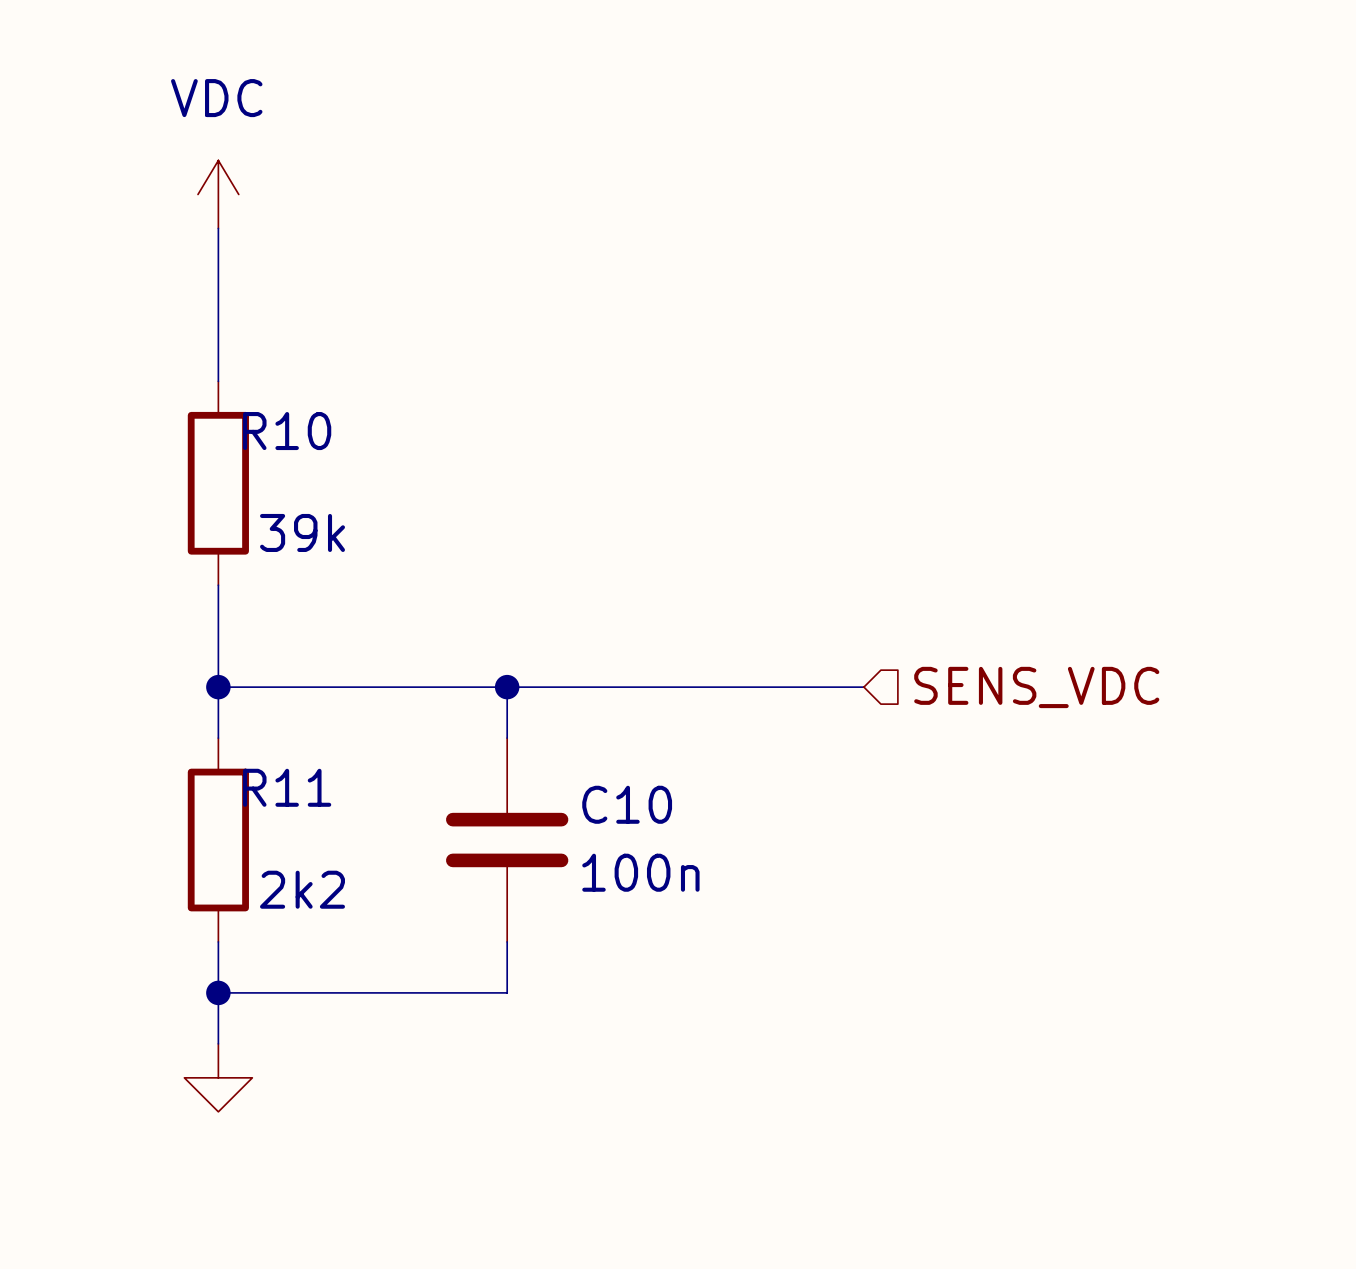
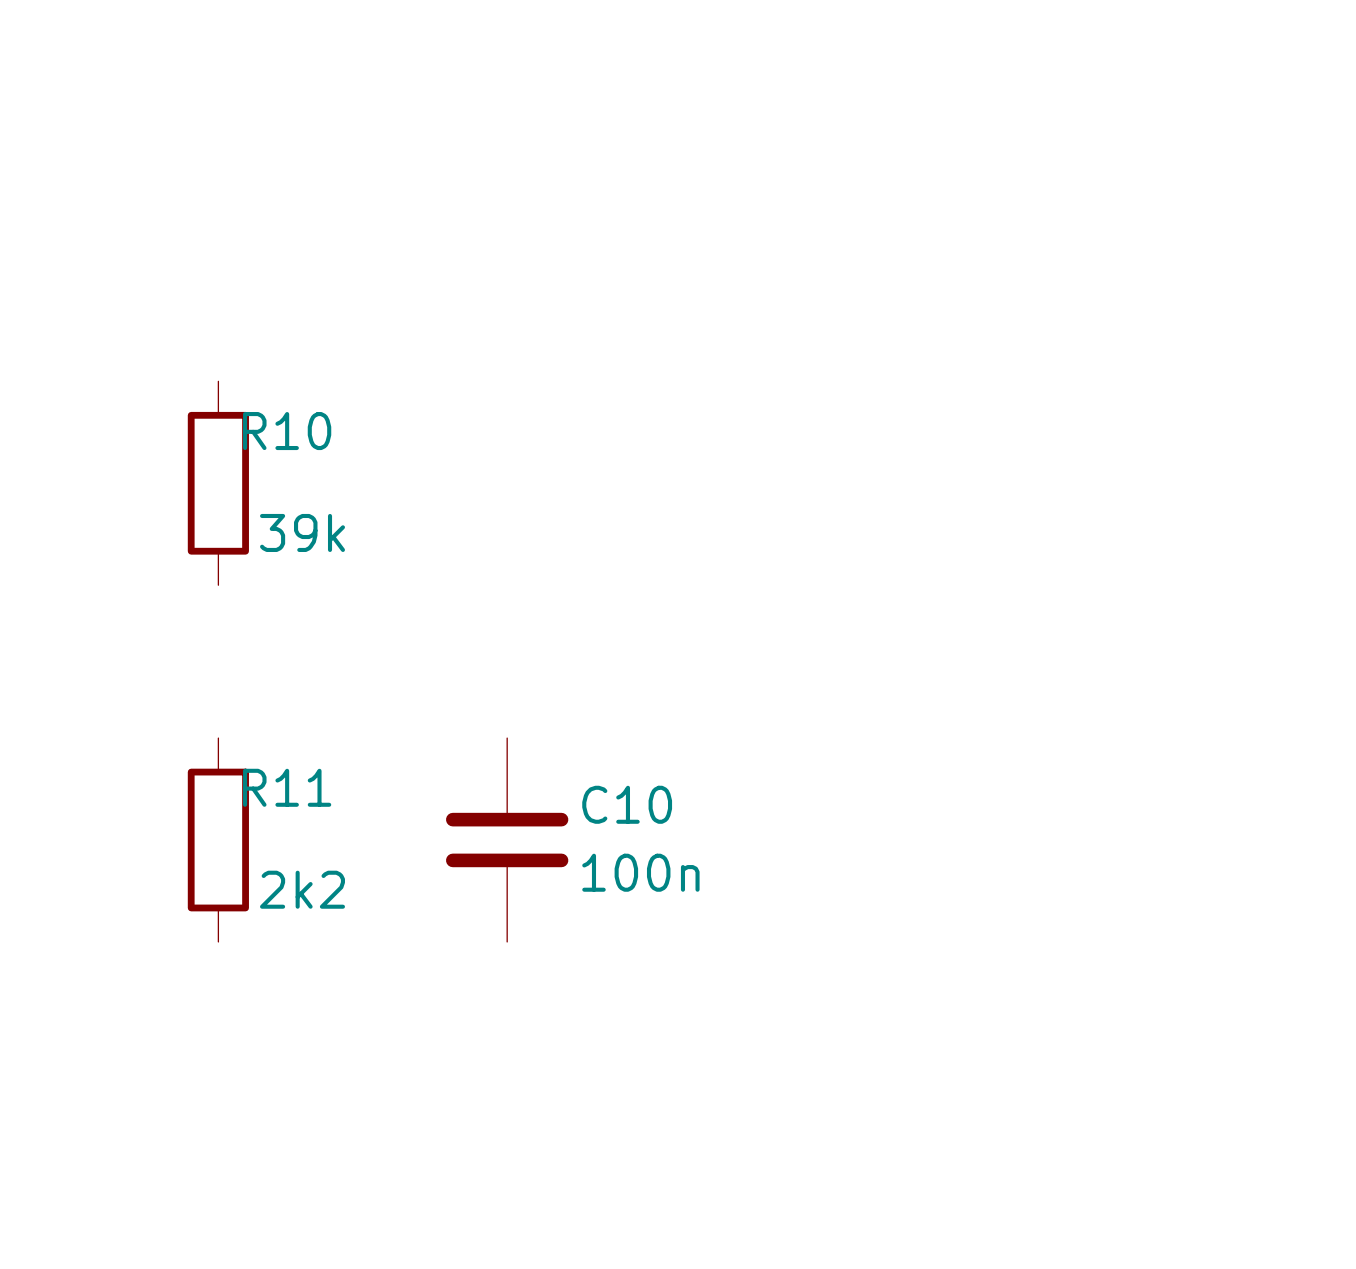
power symbol: VDC (218, 194) -> none
wire: (218, 228) (218, 381) -> none
wire: (218, 585) (218, 738) -> none
wire: (218, 687) (863, 687) -> none
junction: (218, 687) -> none
wire: (507, 687) (507, 738) -> none
junction: (507, 687) -> none
hierarchical label: SENS_VDC (1036, 687) -> none
wire: (218, 941) (218, 1043) -> none
wire: (507, 941) (507, 992) (218, 992) -> none
junction: (218, 992) -> none
power symbol: (218, 1077) -> none

